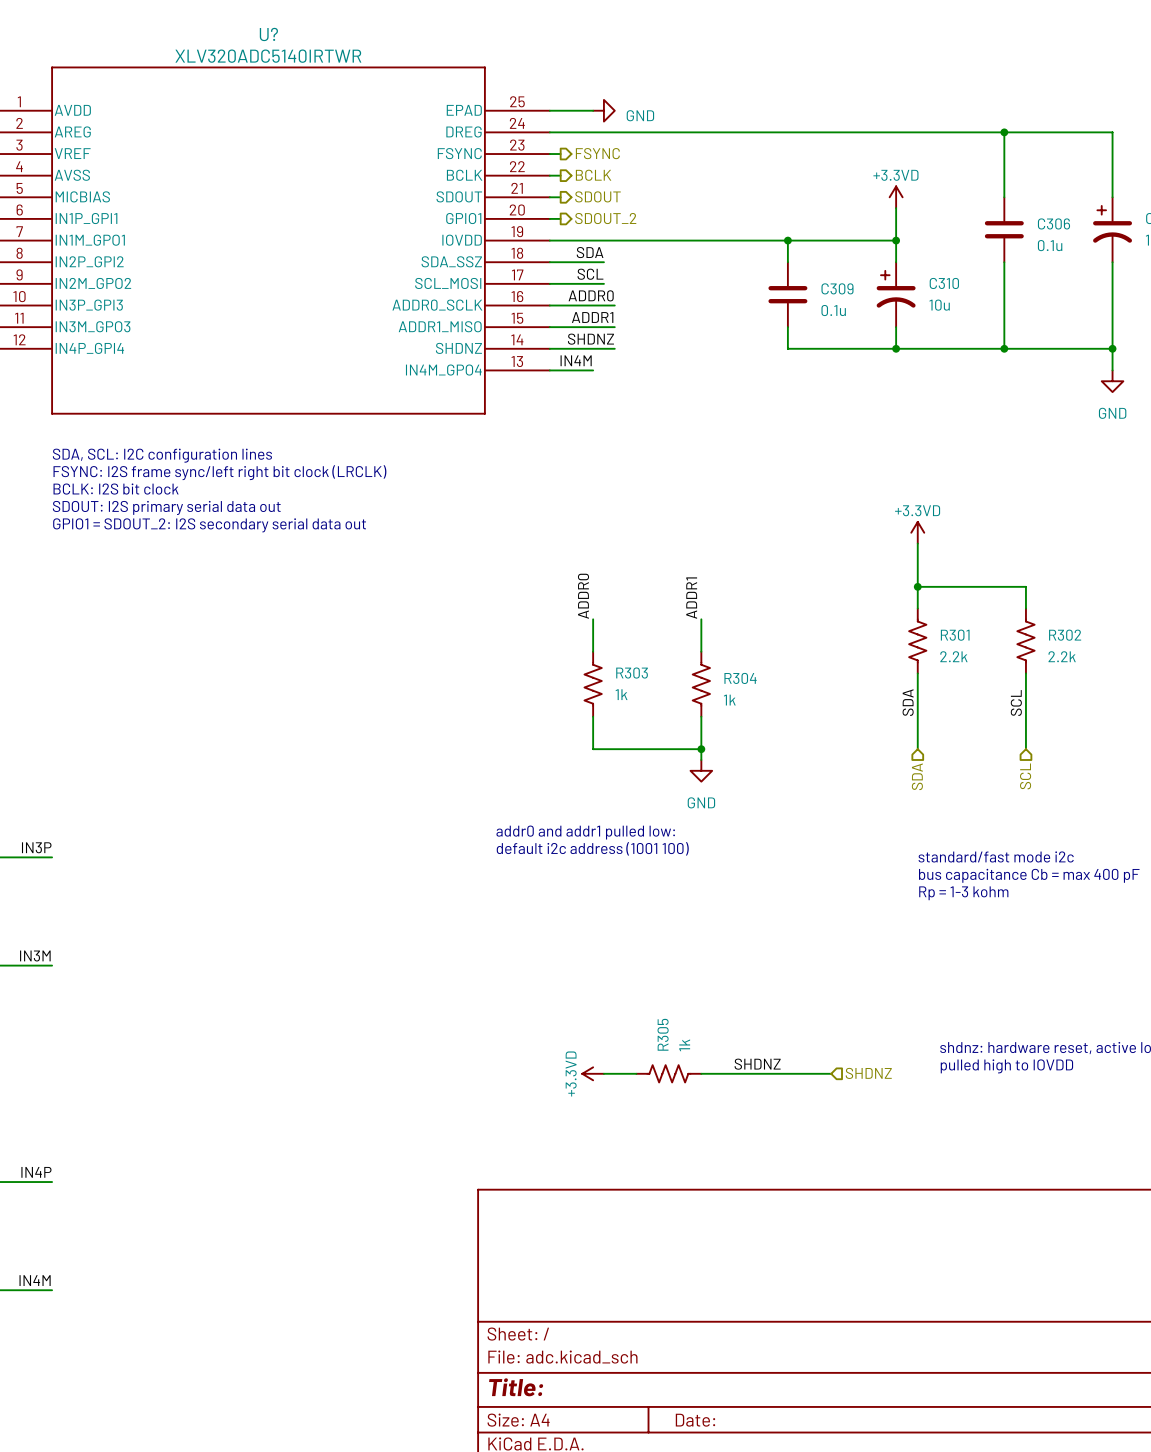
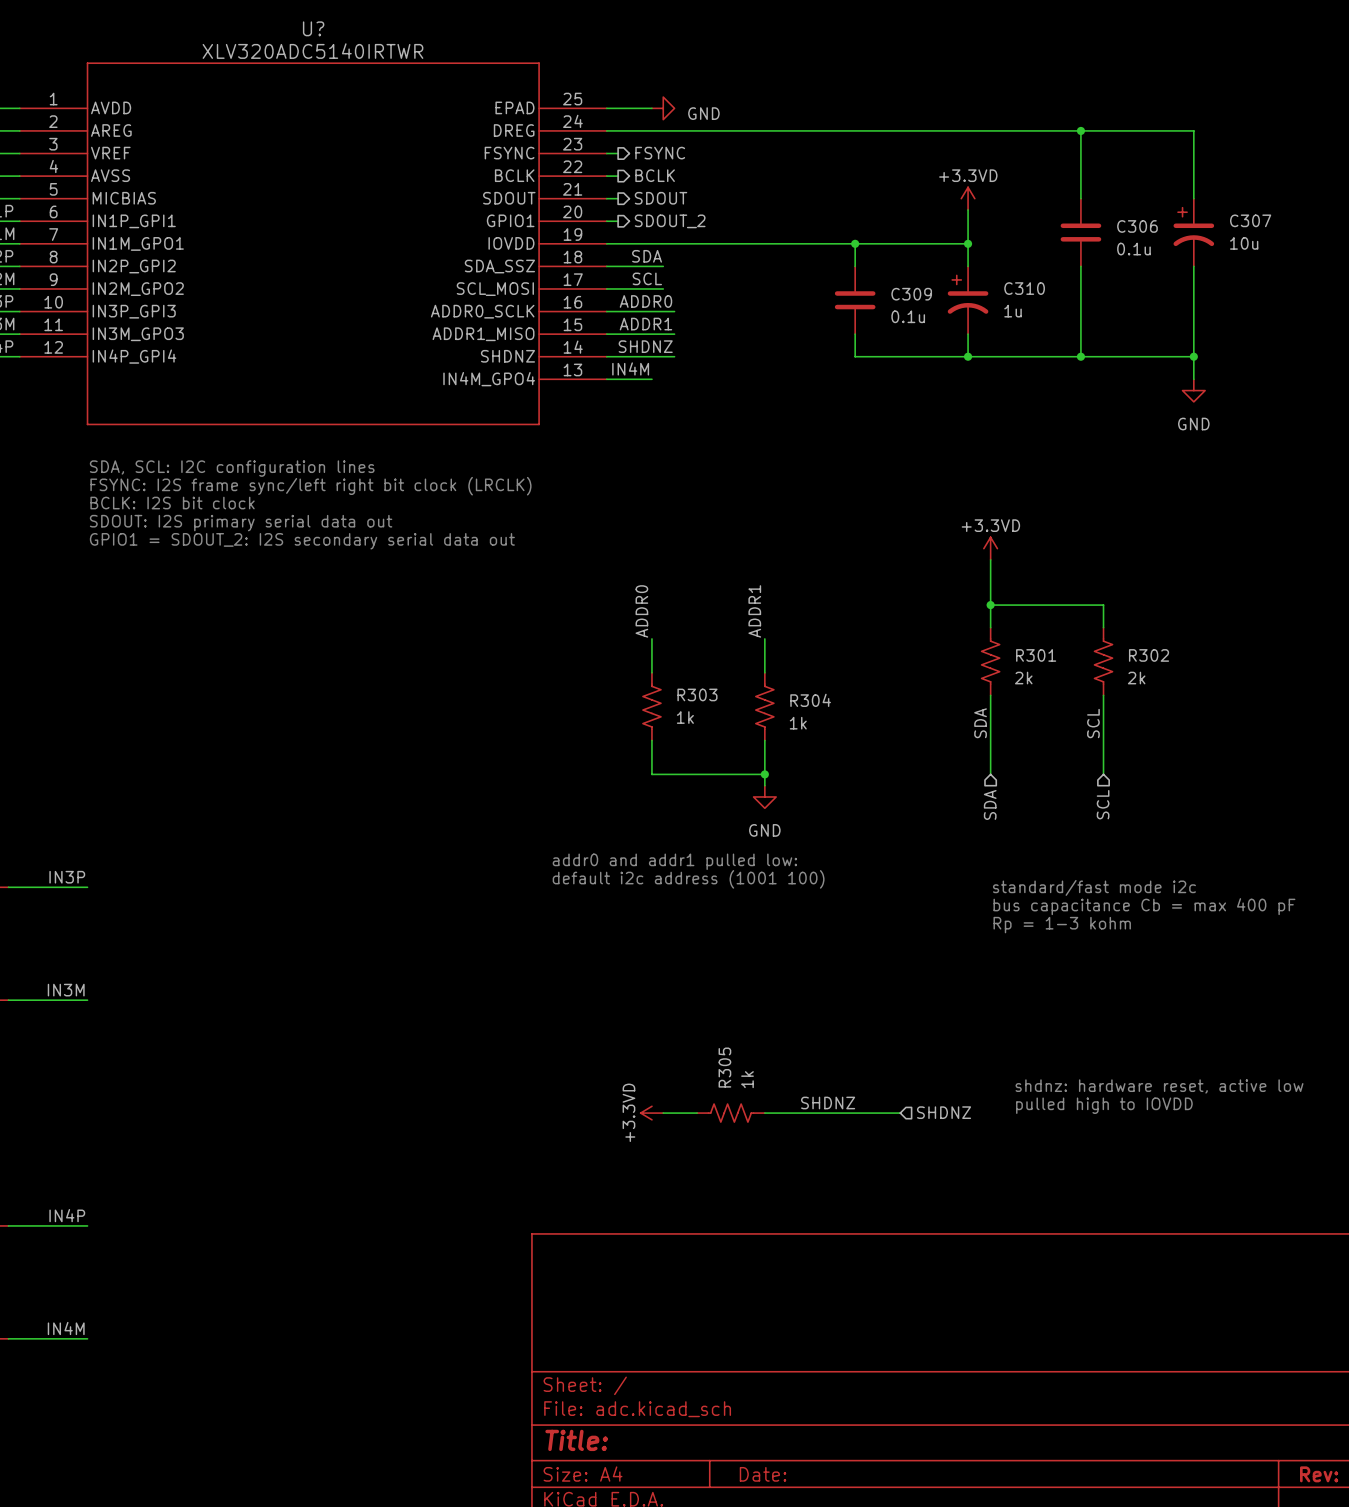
C310 value: 10u (939, 305) -> 1u (1013, 311)
R301 value: 2.2k (953, 656) -> 2k (1023, 678)
R302 value: 2.2k (1062, 656) -> 2k (1136, 678)

